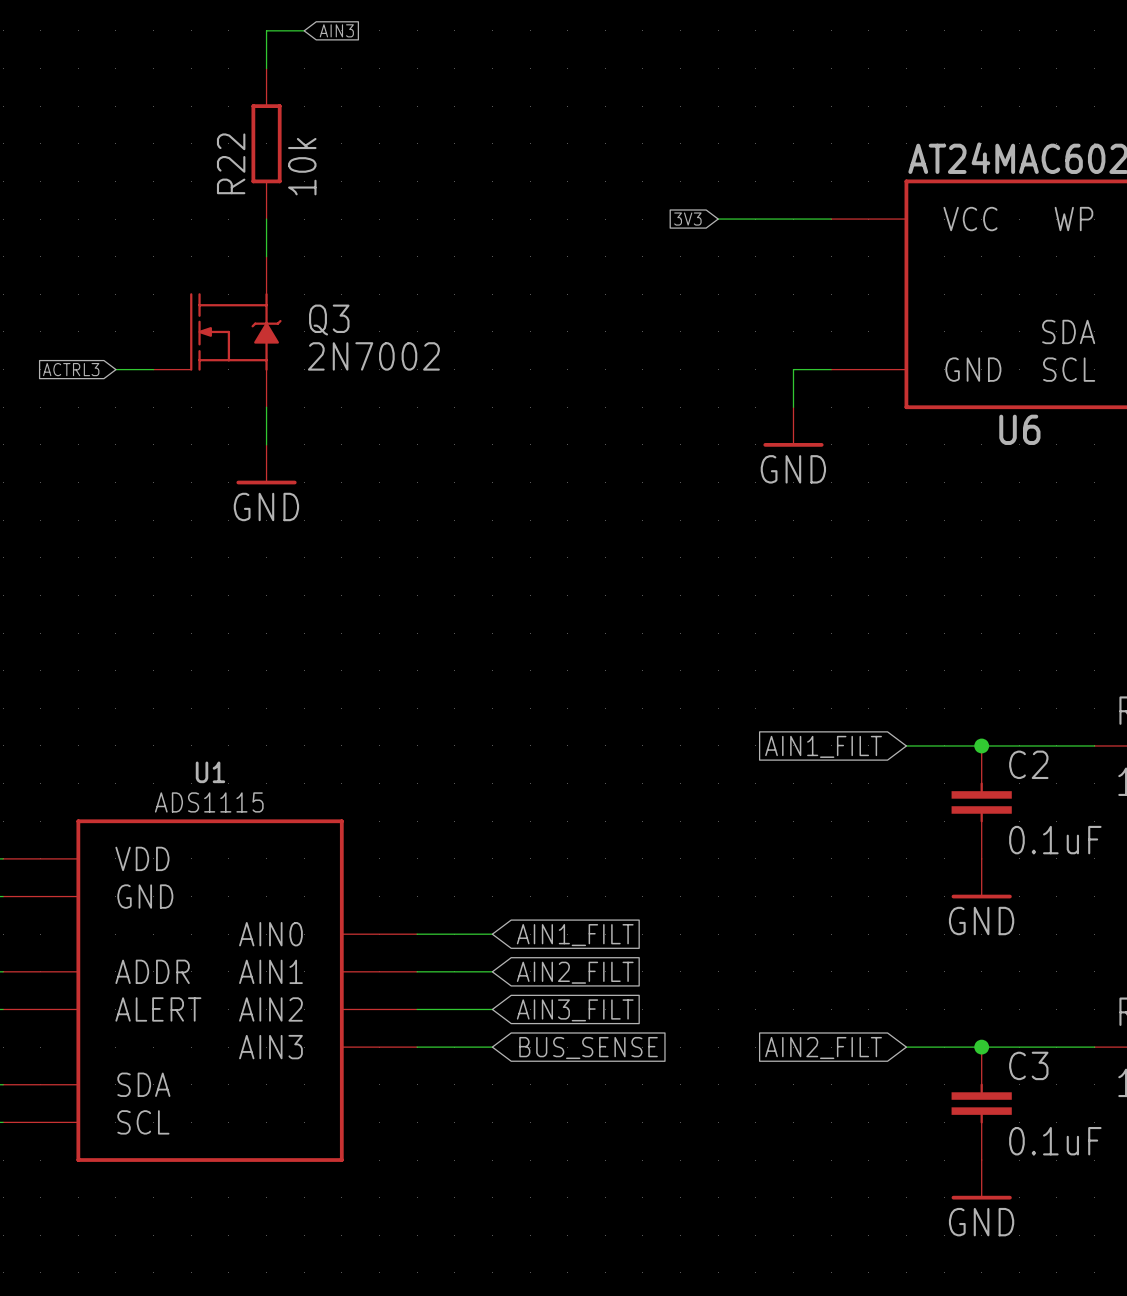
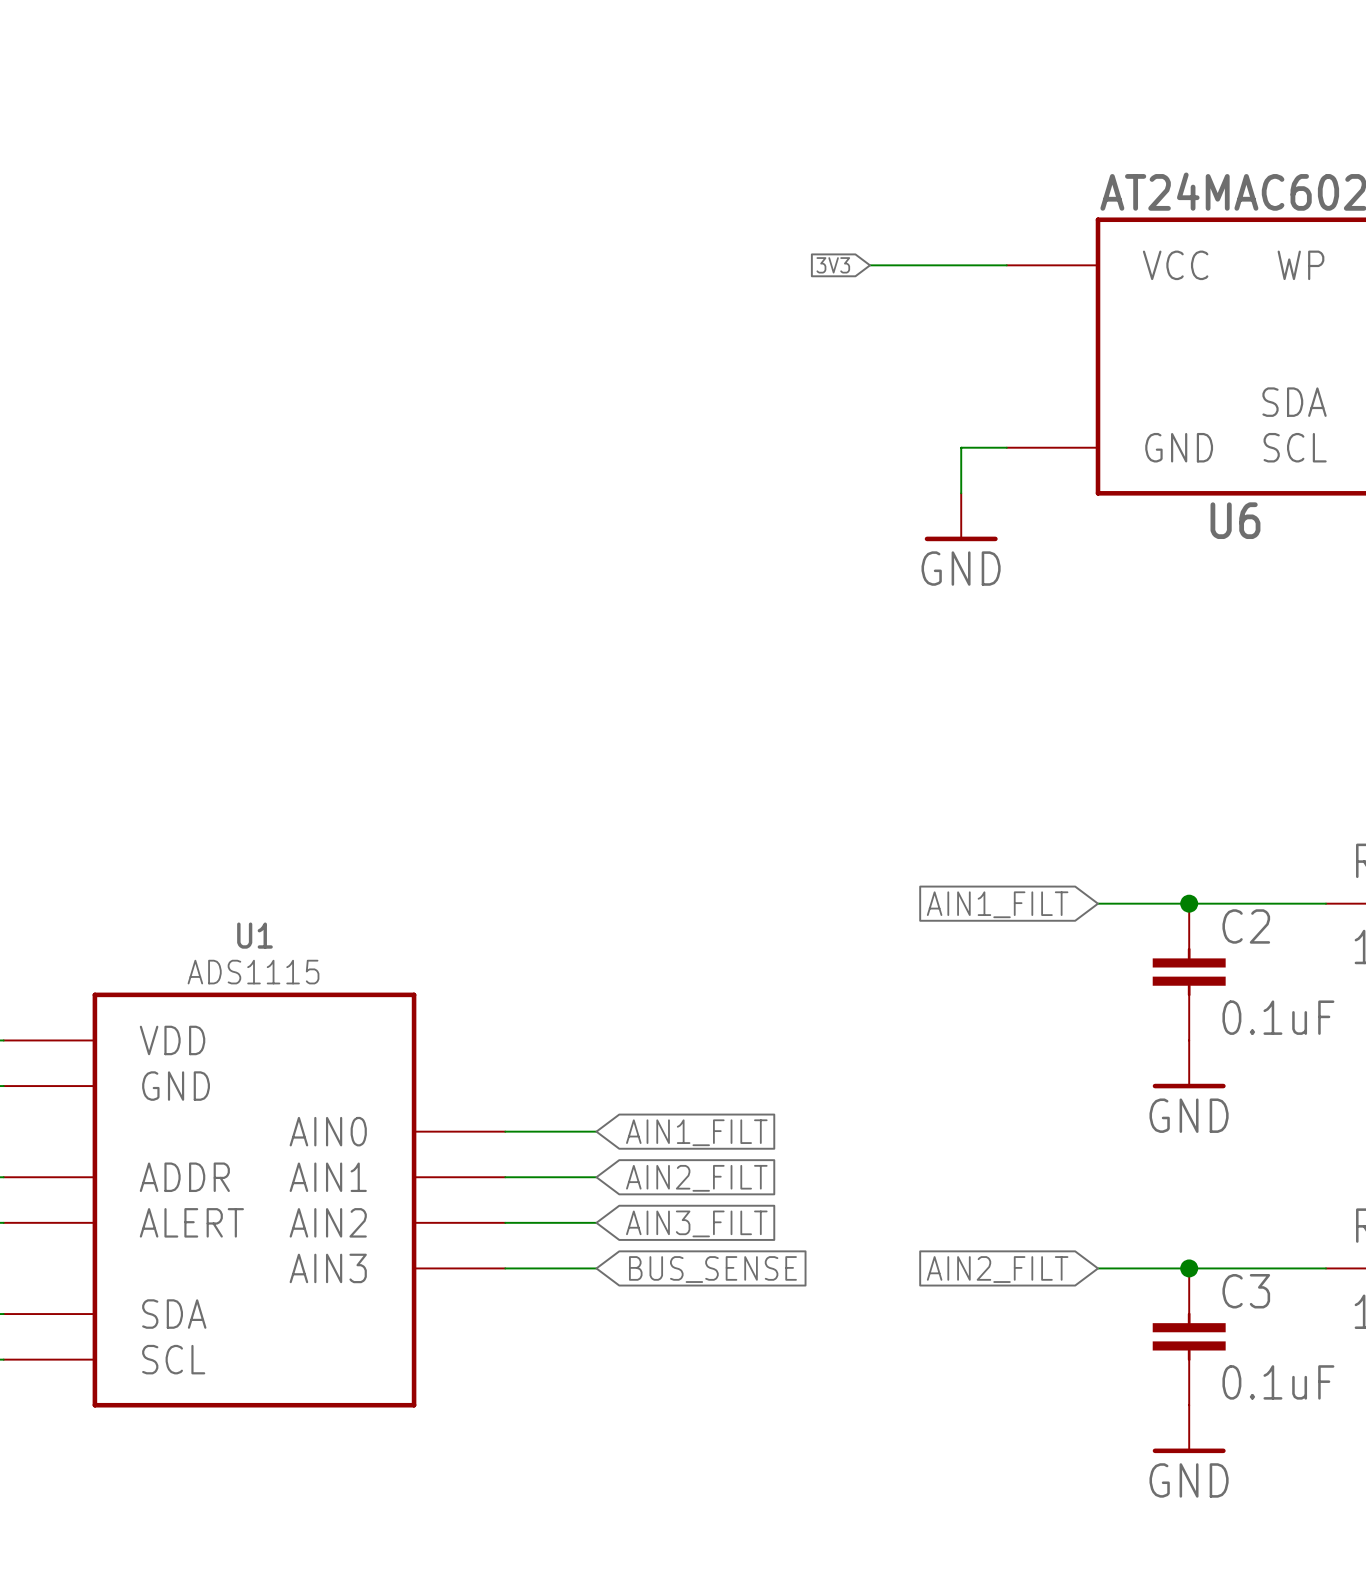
wire: (304, 30) (266, 30) (266, 68) -> none
global label: AIN3 (336, 30) -> none
R22: 10k (266, 143) -> none
wire: (266, 219) (266, 256) -> none
Q3: 2N7002 (217, 331) -> none
global label: ACTRL3 (71, 369) -> none
wire: (115, 369) (153, 369) -> none
wire: (266, 407) (266, 444) -> none
power symbol: GND (266, 464) -> none

